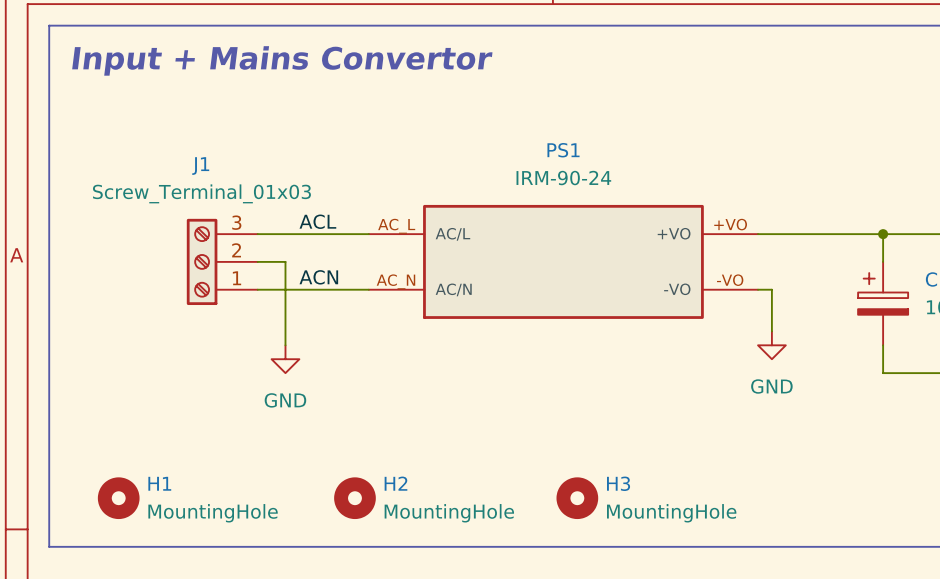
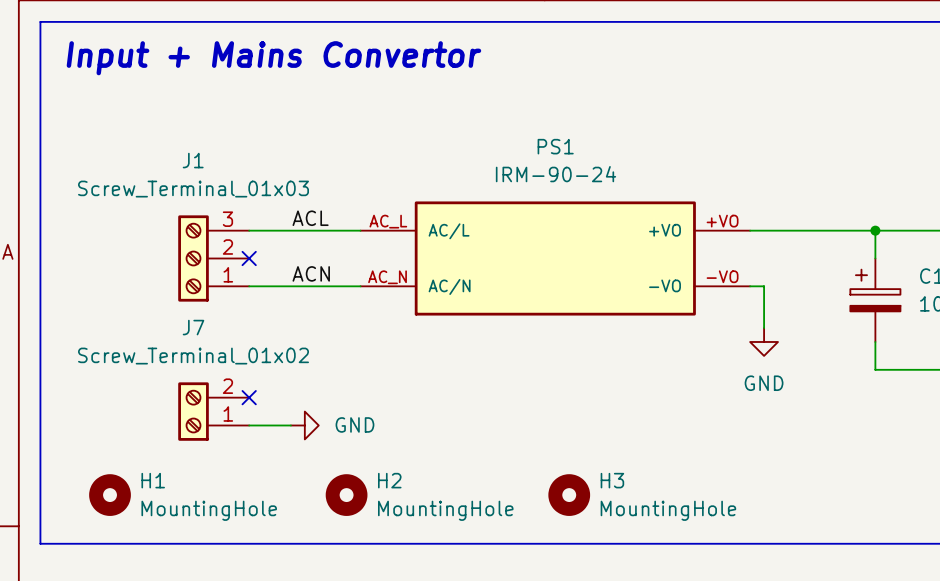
wire: (257, 261) (285, 261) (285, 345) -> none
no-connect mark: none -> (249, 258)
power symbol rotation: 0° (285, 359) -> 90° counterclockwise (304, 425)
power symbol position: GND (285, 359) -> GND (304, 425)
no-connect mark: none -> (249, 397)
J7: none -> Screw_Terminal_01x02 (213, 411)
wire: none -> (249, 425) (290, 425)

